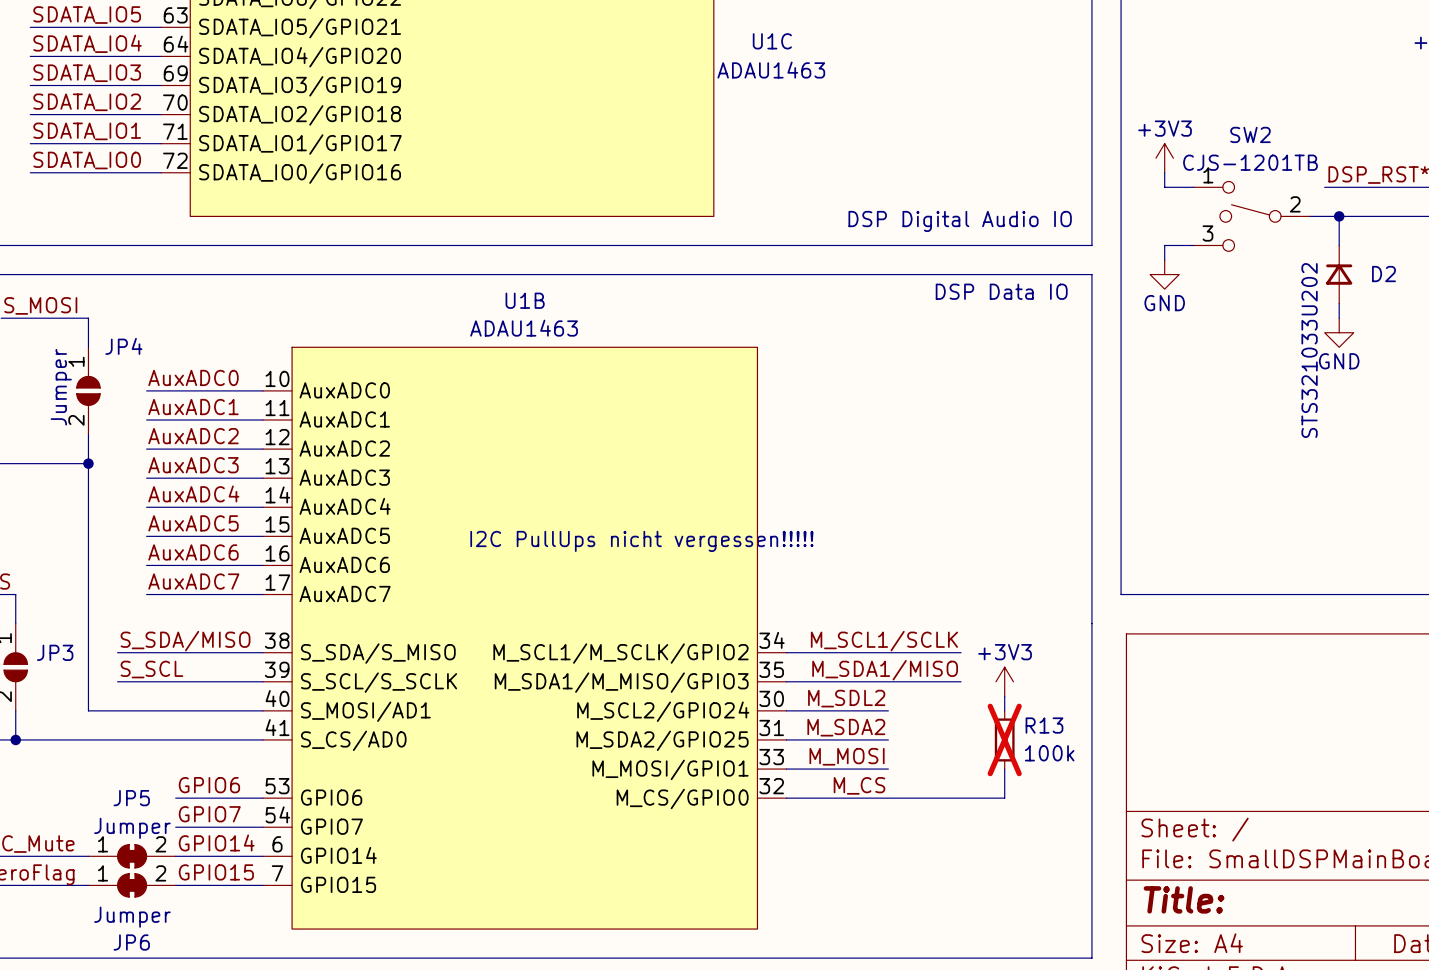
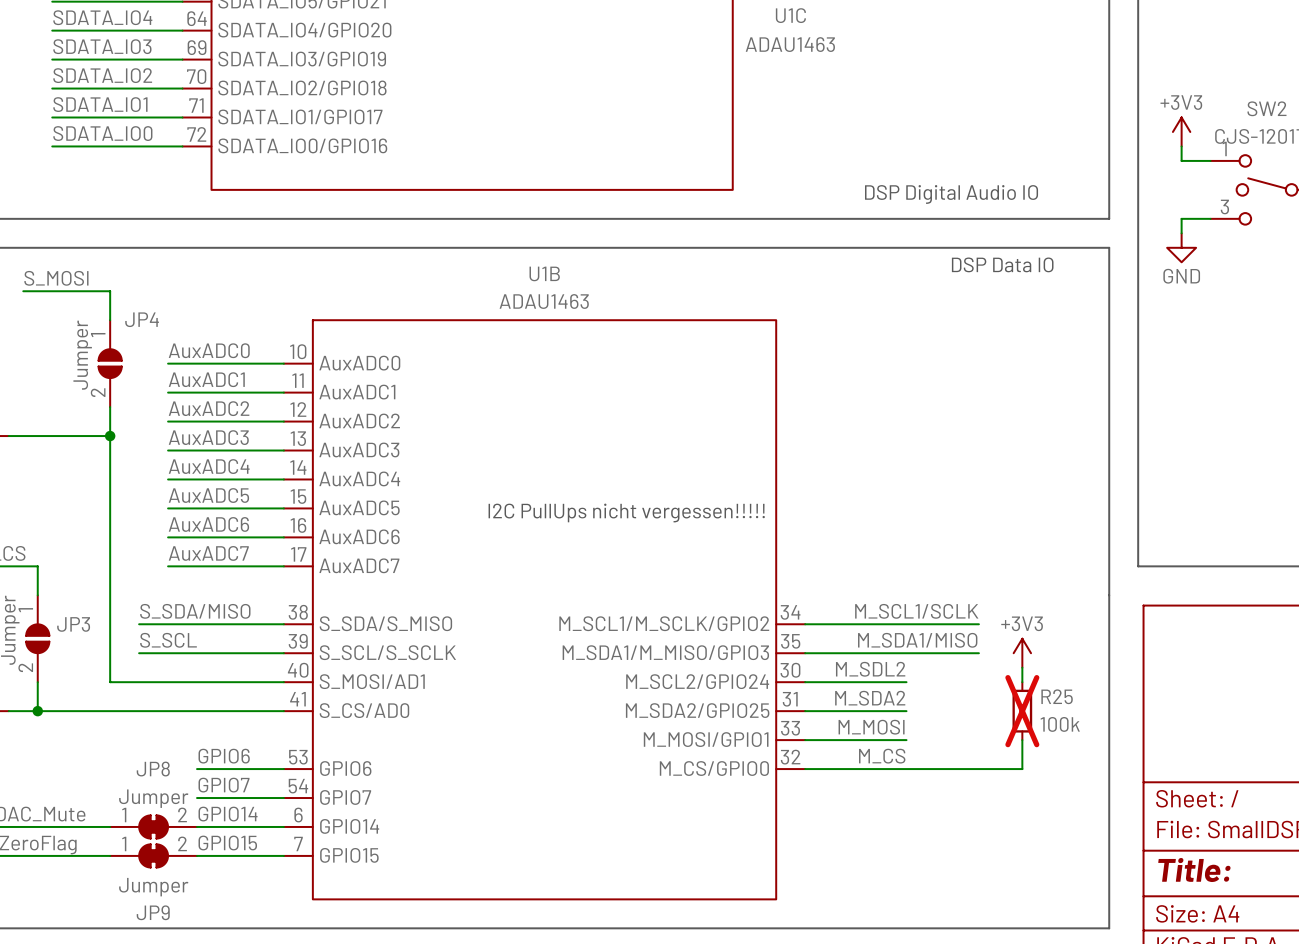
R13 name: R13 (1044, 725) -> R25 (1057, 696)
JP5 name: JP5 (131, 798) -> JP8 (153, 769)
JP6 name: JP6 (131, 942) -> JP9 (153, 912)

